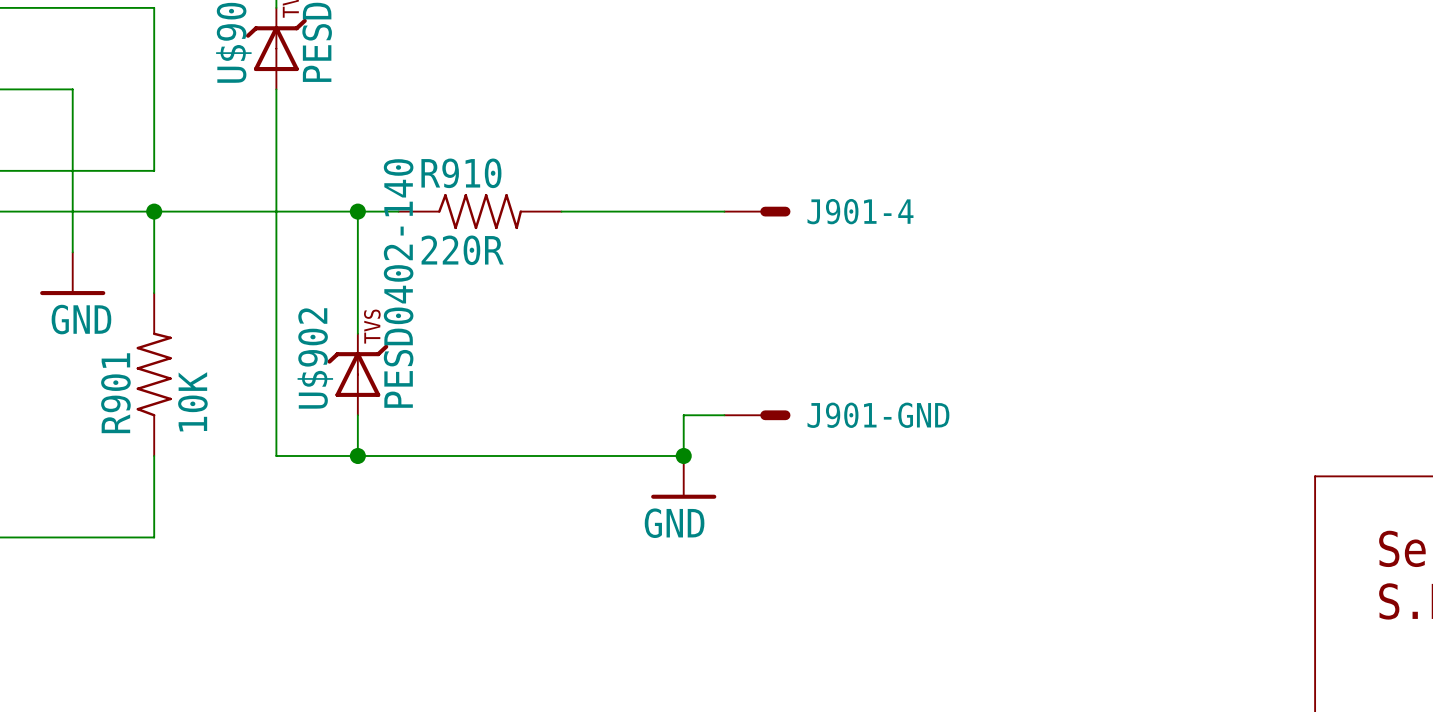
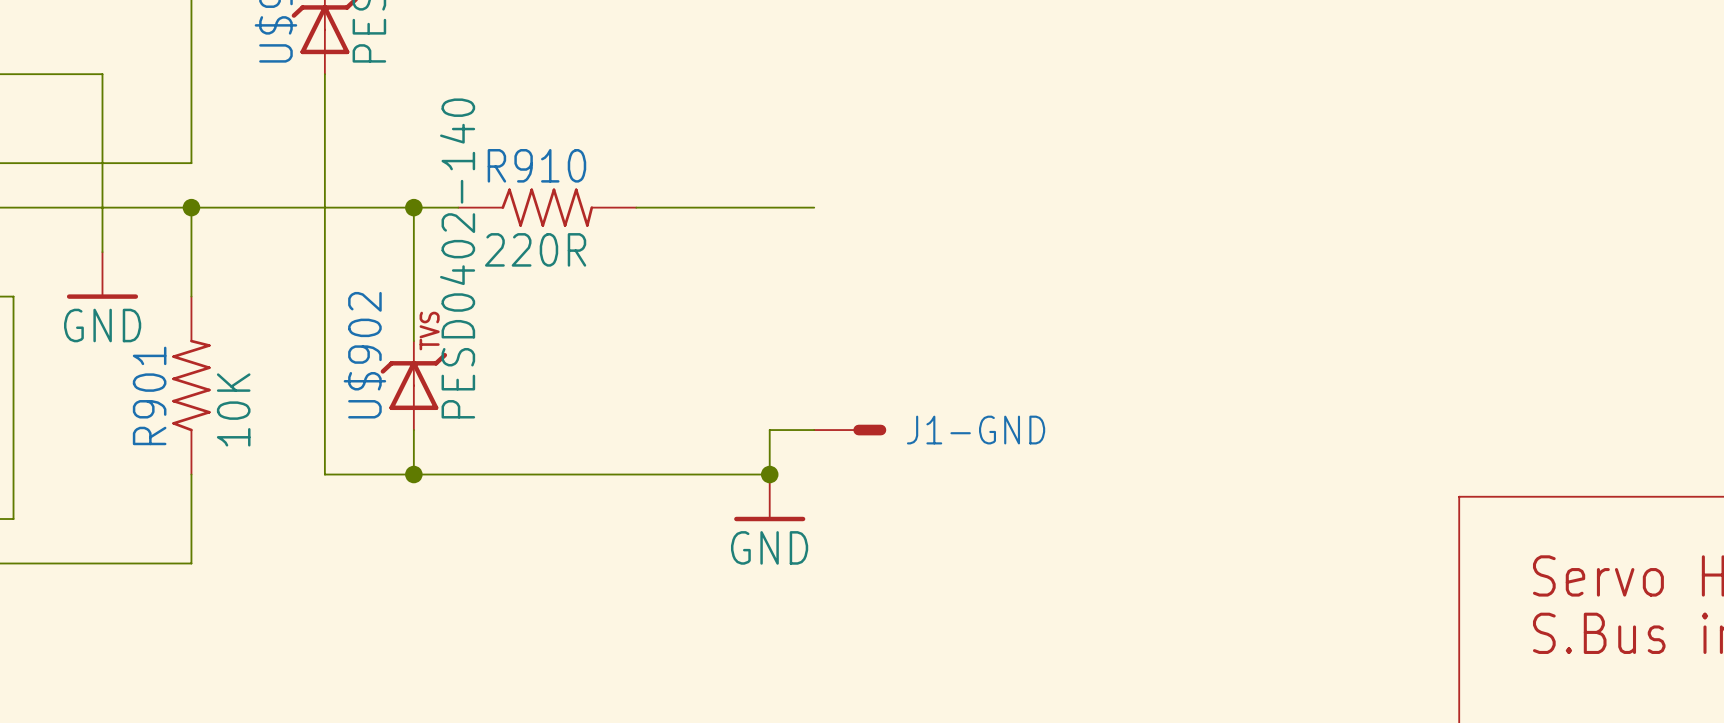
J901-4: (757, 211) -> none
J901-GND name: J901-GND (878, 415) -> J1-GND (976, 430)

